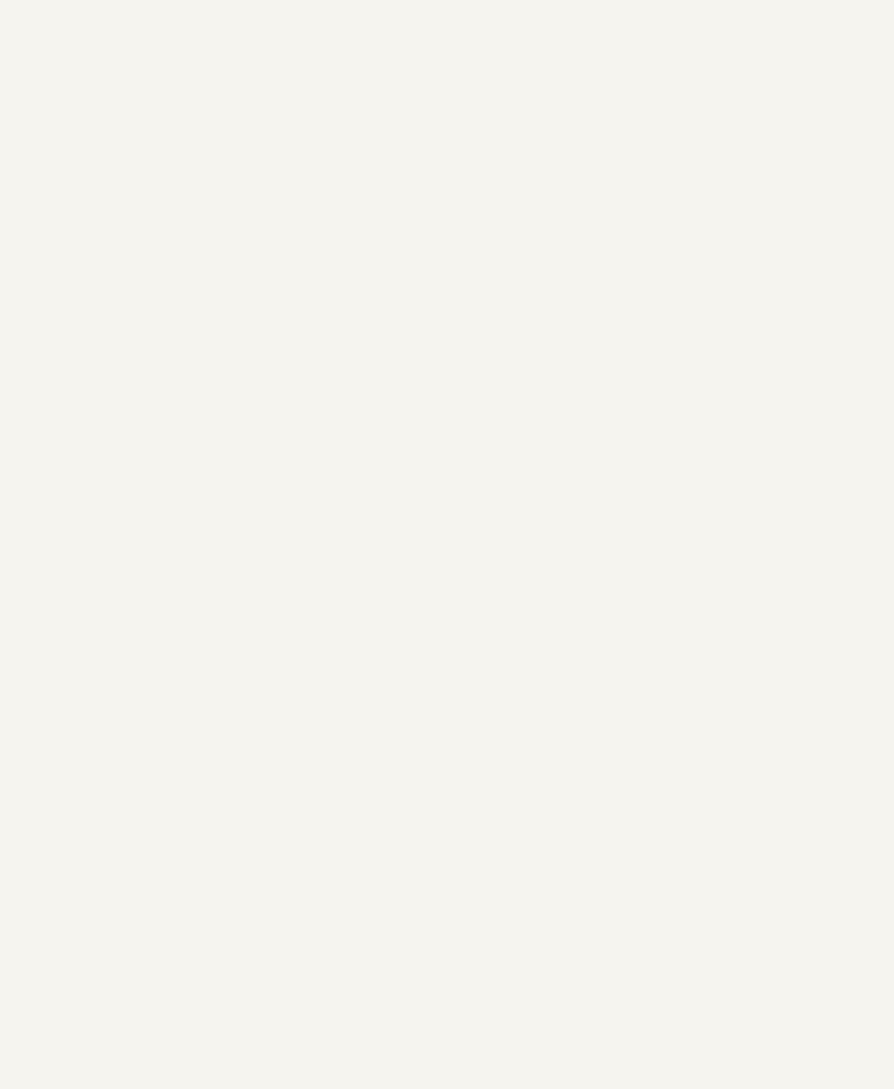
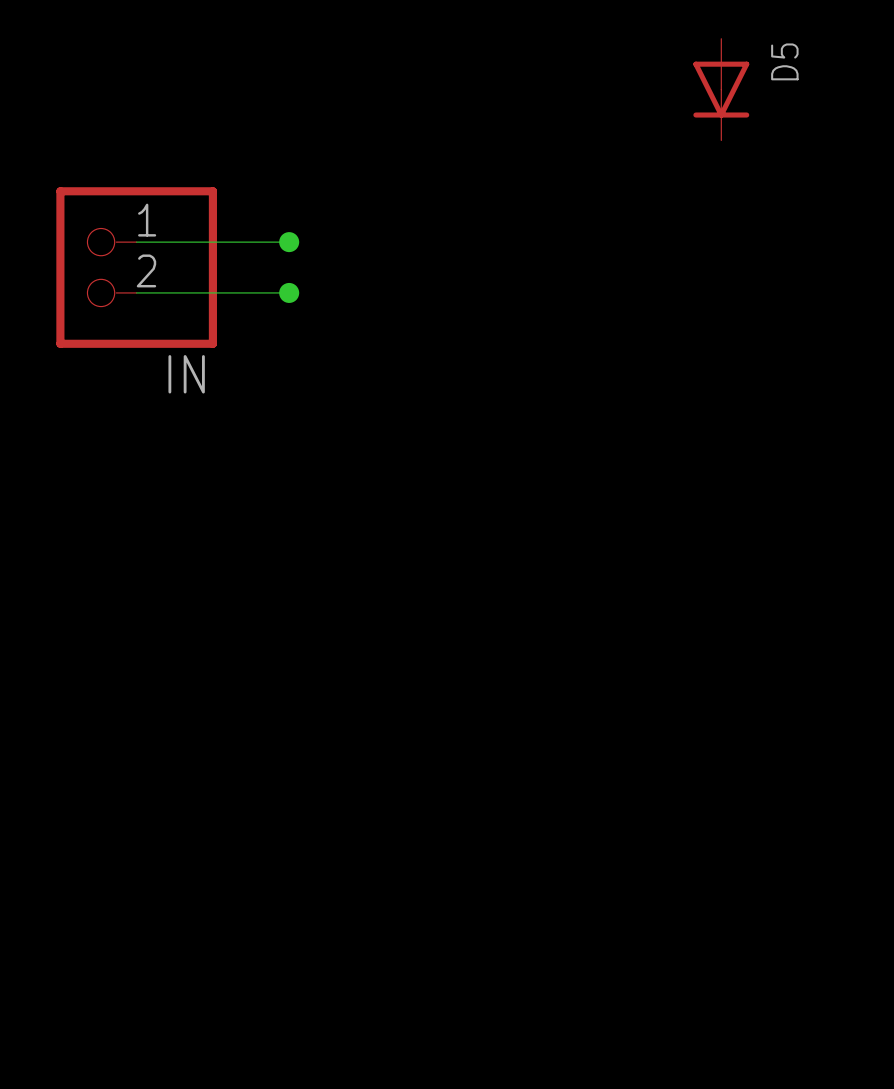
D5: none -> (721, 89)
wire: none -> (136, 242) (289, 242)
junction: none -> (289, 242)
IN: none -> (136, 267)
wire: none -> (136, 292) (289, 292)
junction: none -> (289, 292)

